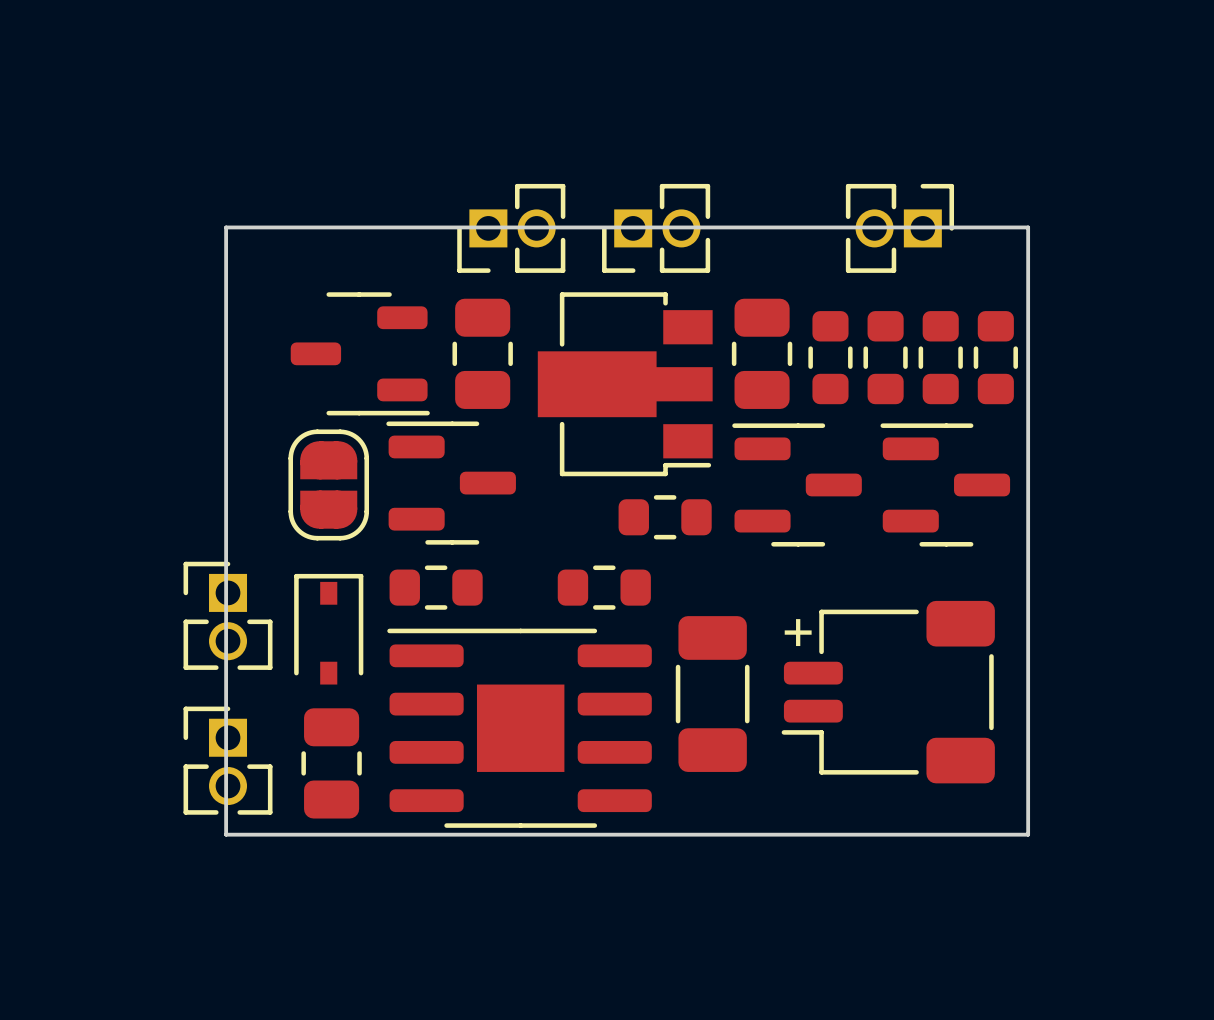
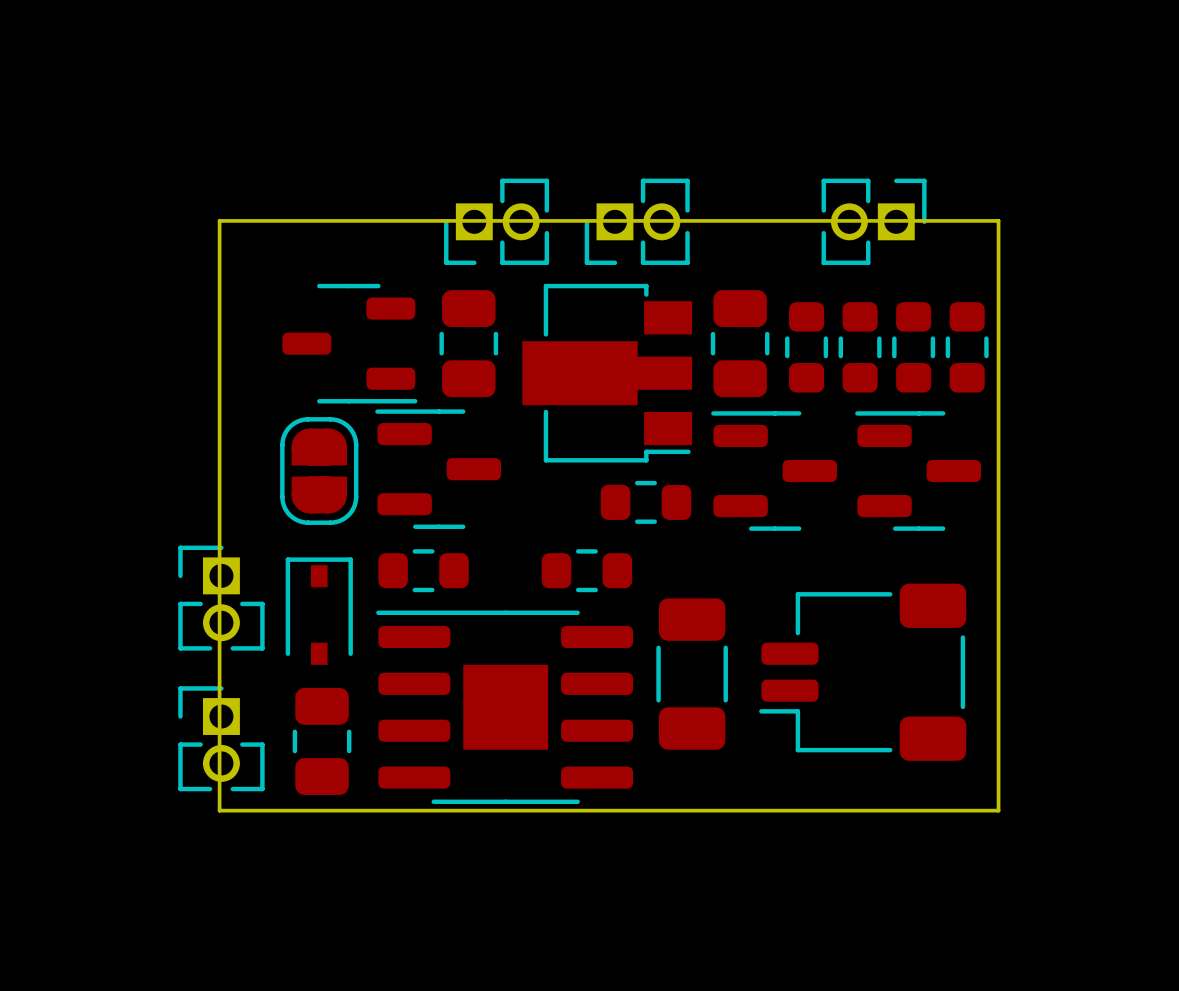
text: + (798, 632) -> none

